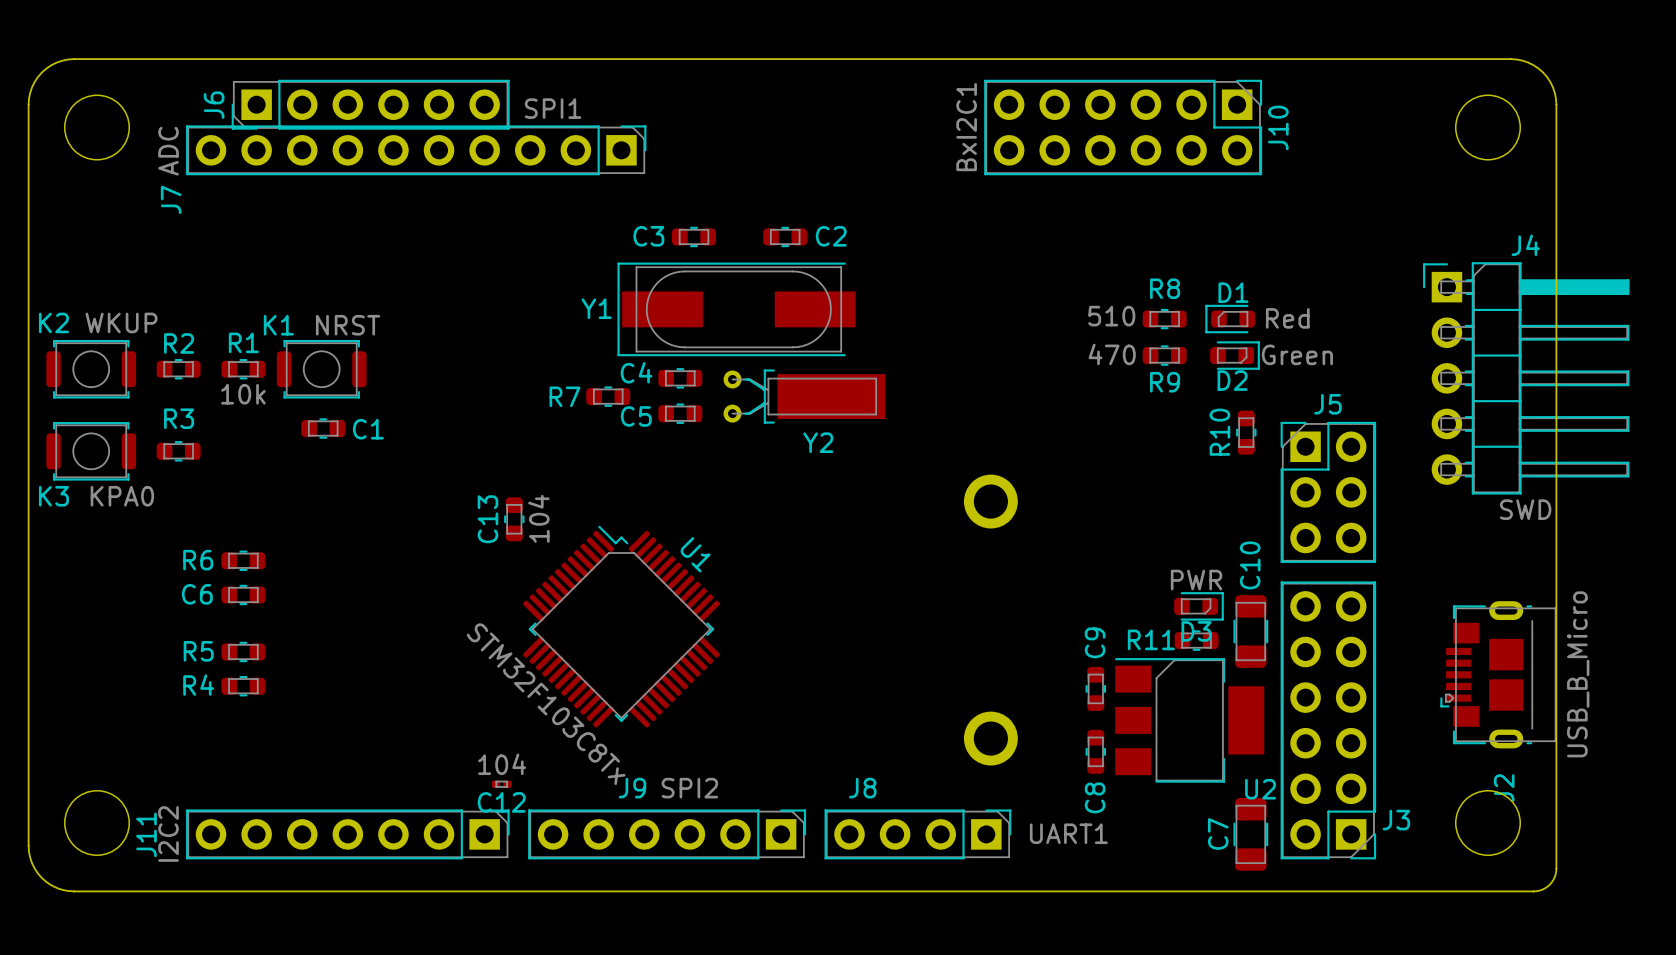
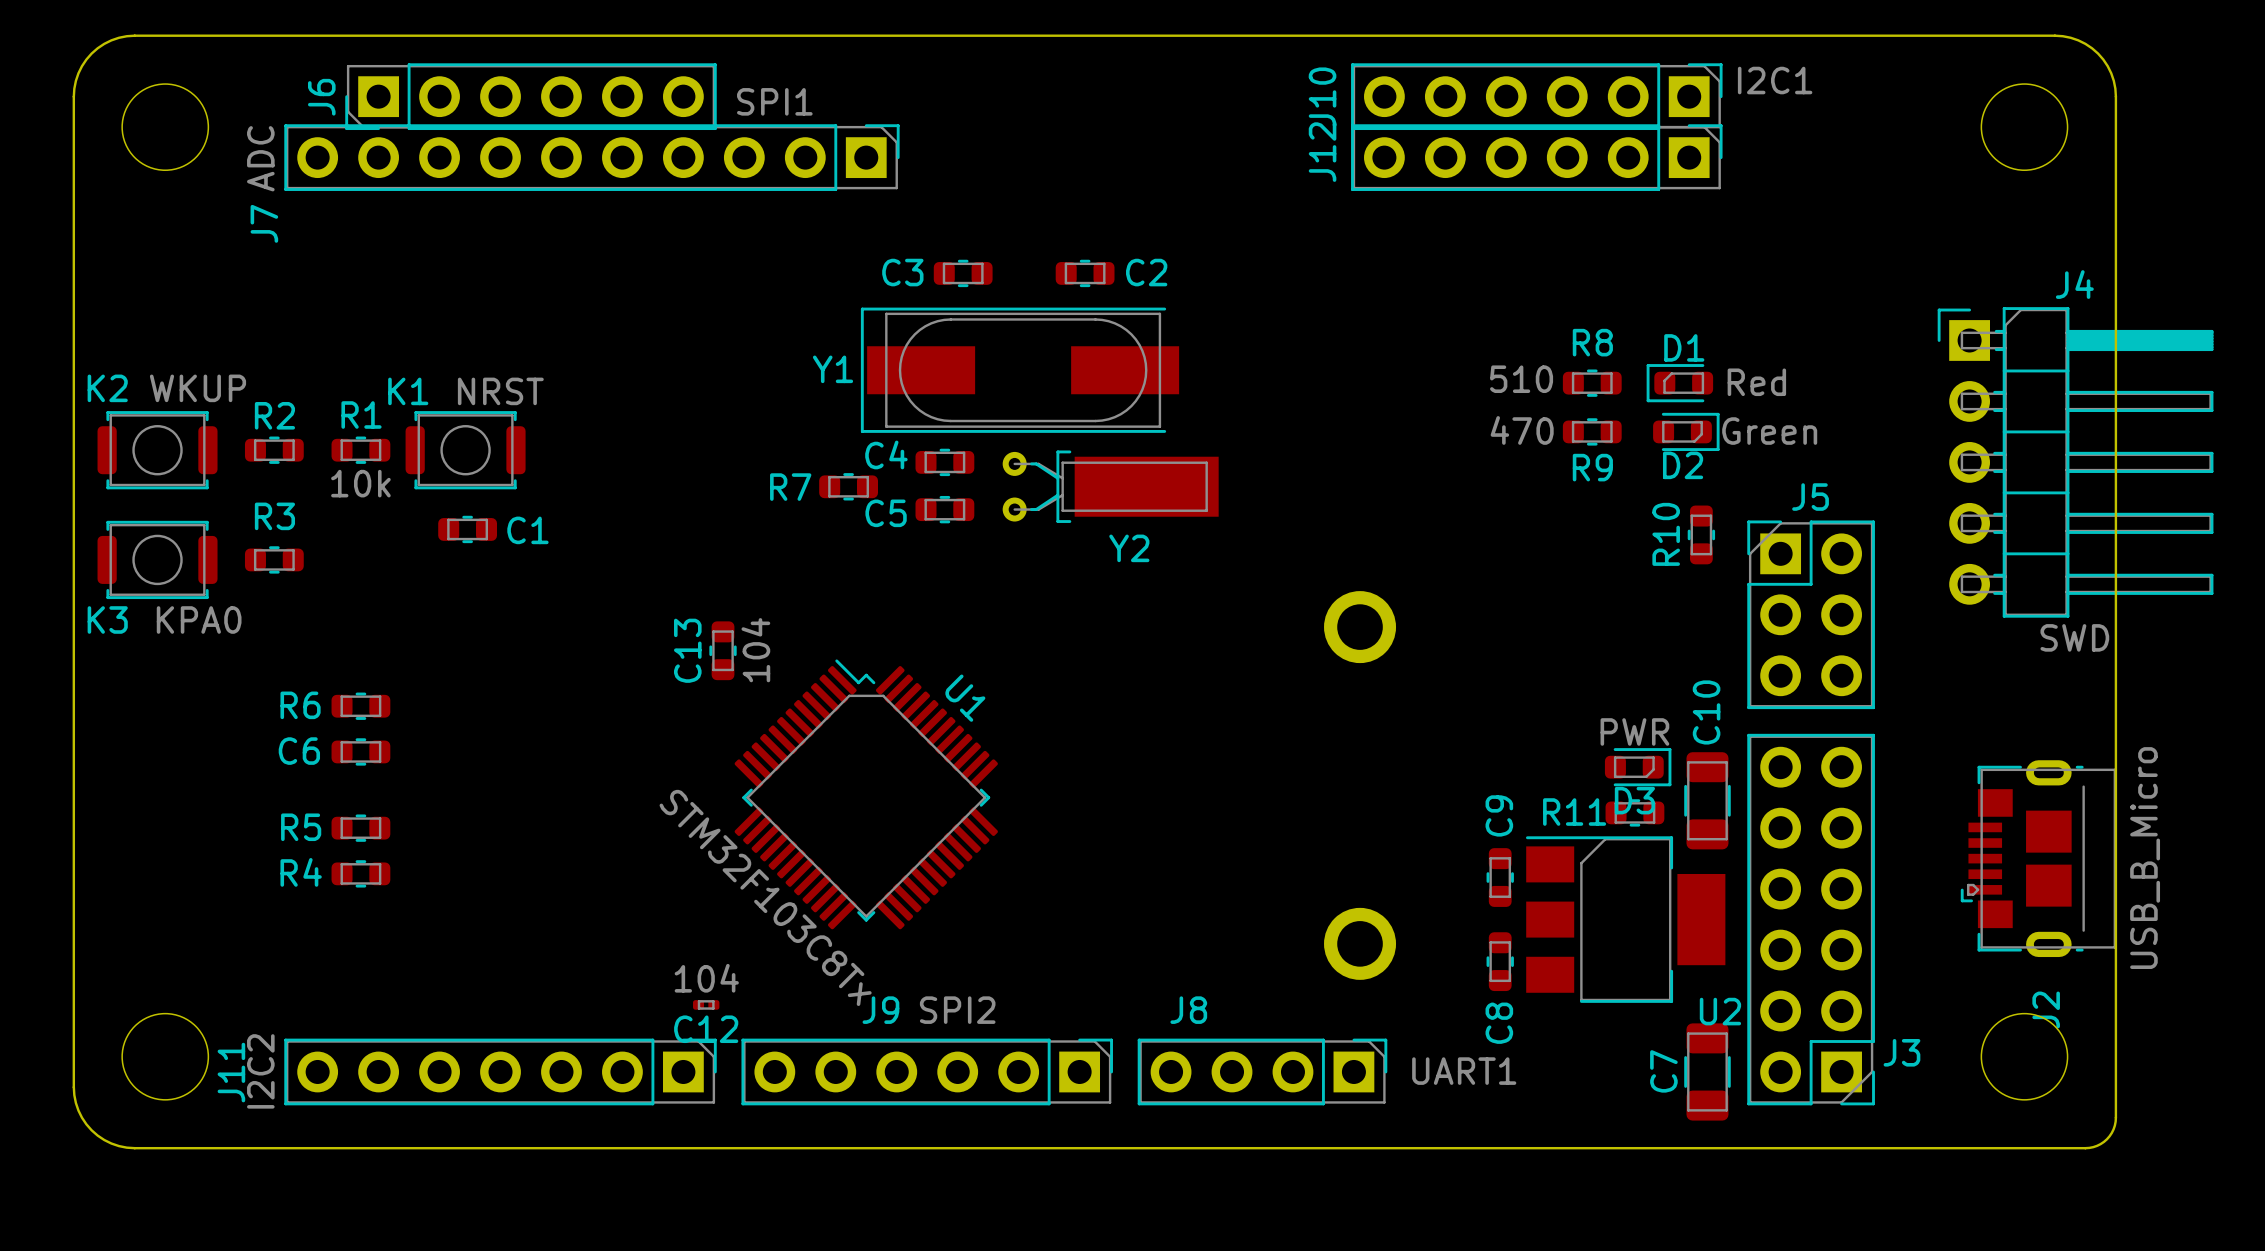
J10 footprint: [984, 79, 1263, 176] -> [1351, 63, 1723, 131]
J10 value: BxI2C1 (966, 127) -> I2C1 (1775, 80)
J10 name position: J10 (1278, 127) -> J10 (1322, 97)
J12: none -> (1536, 157)

